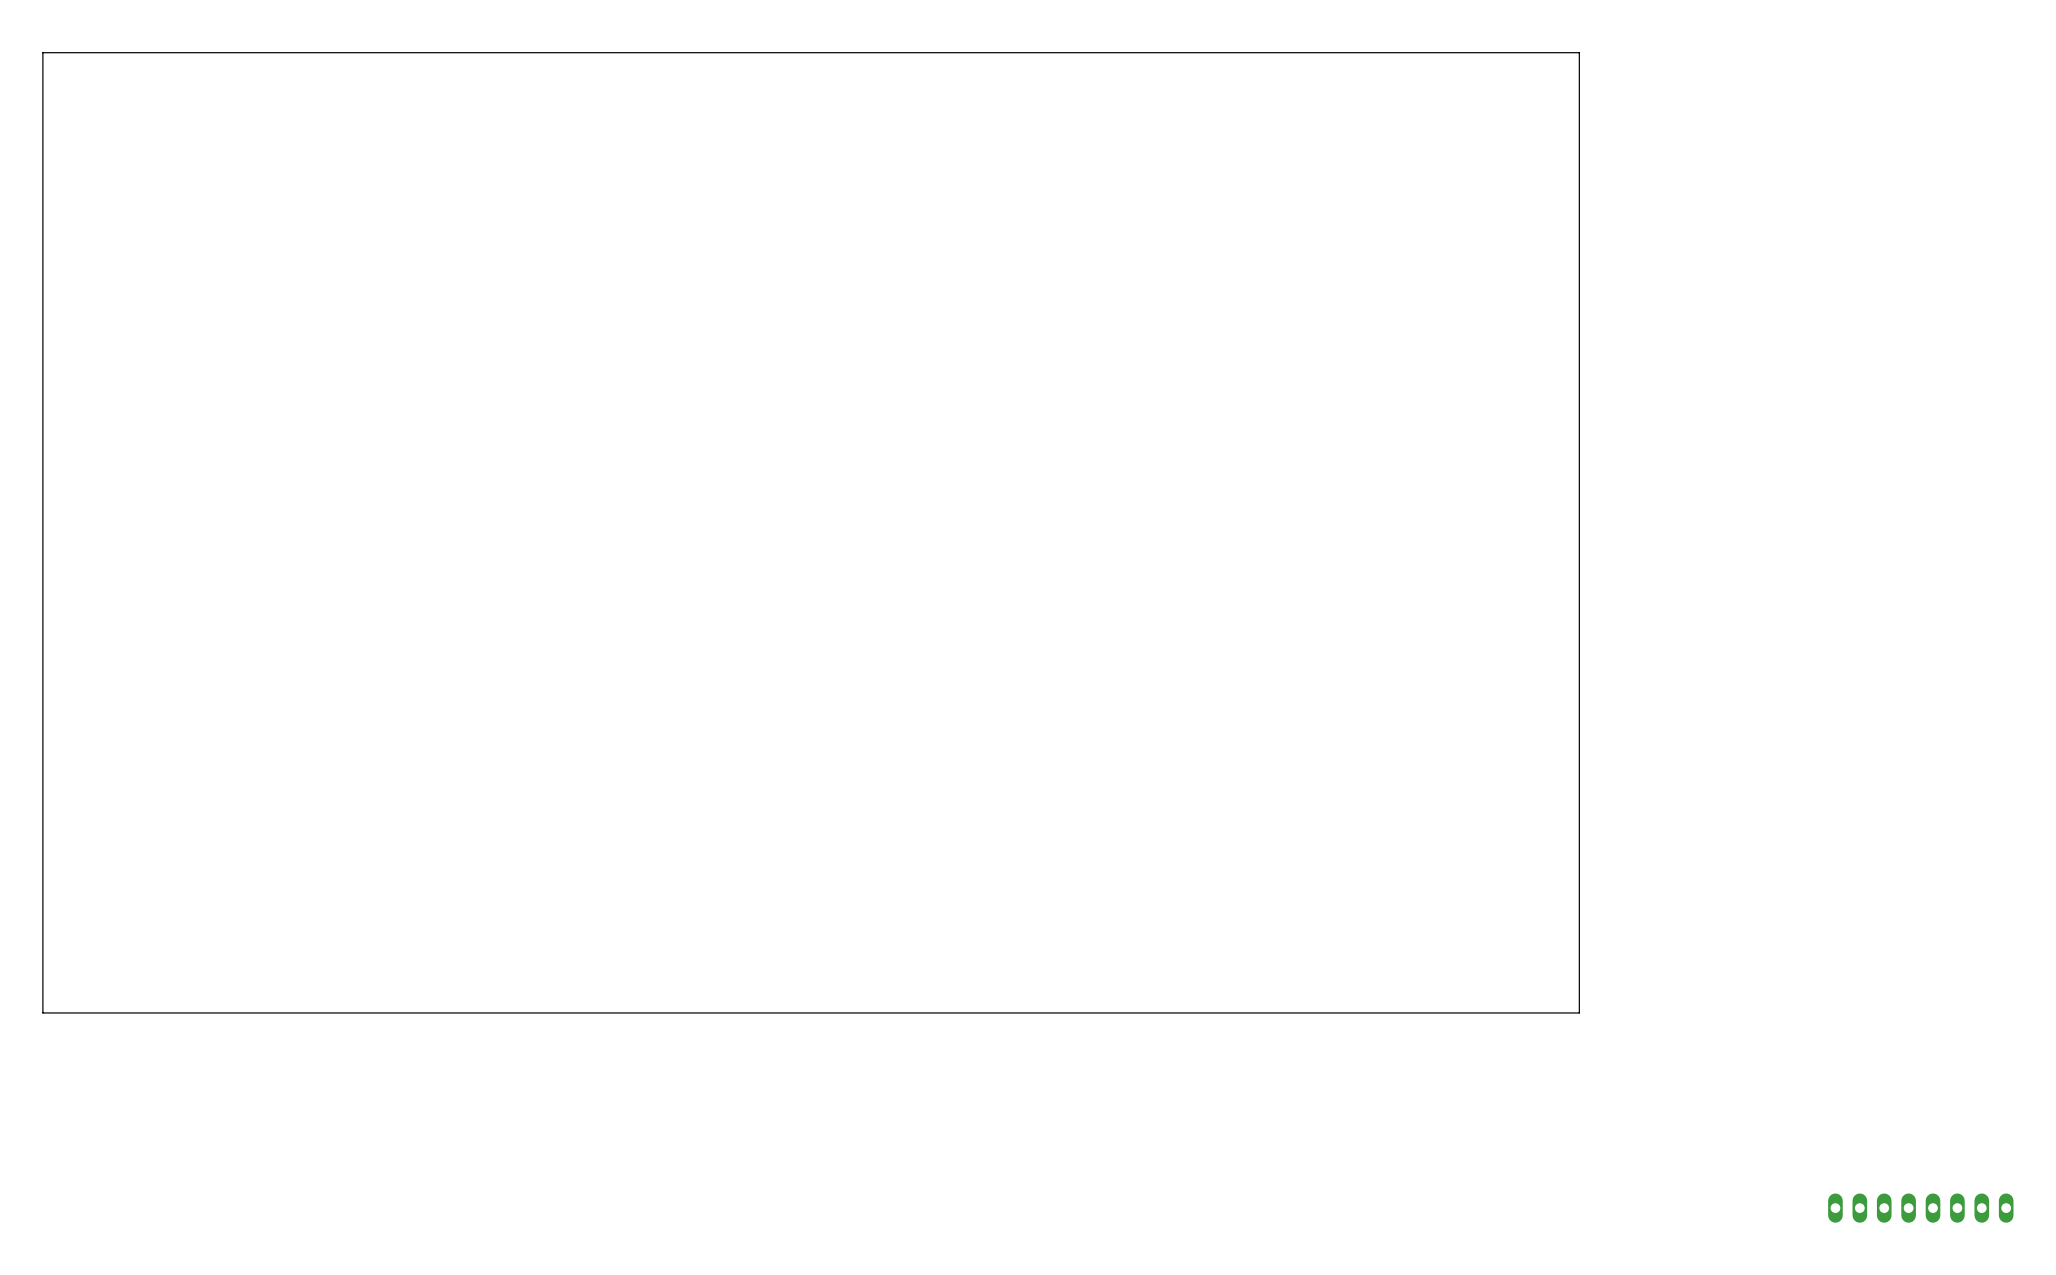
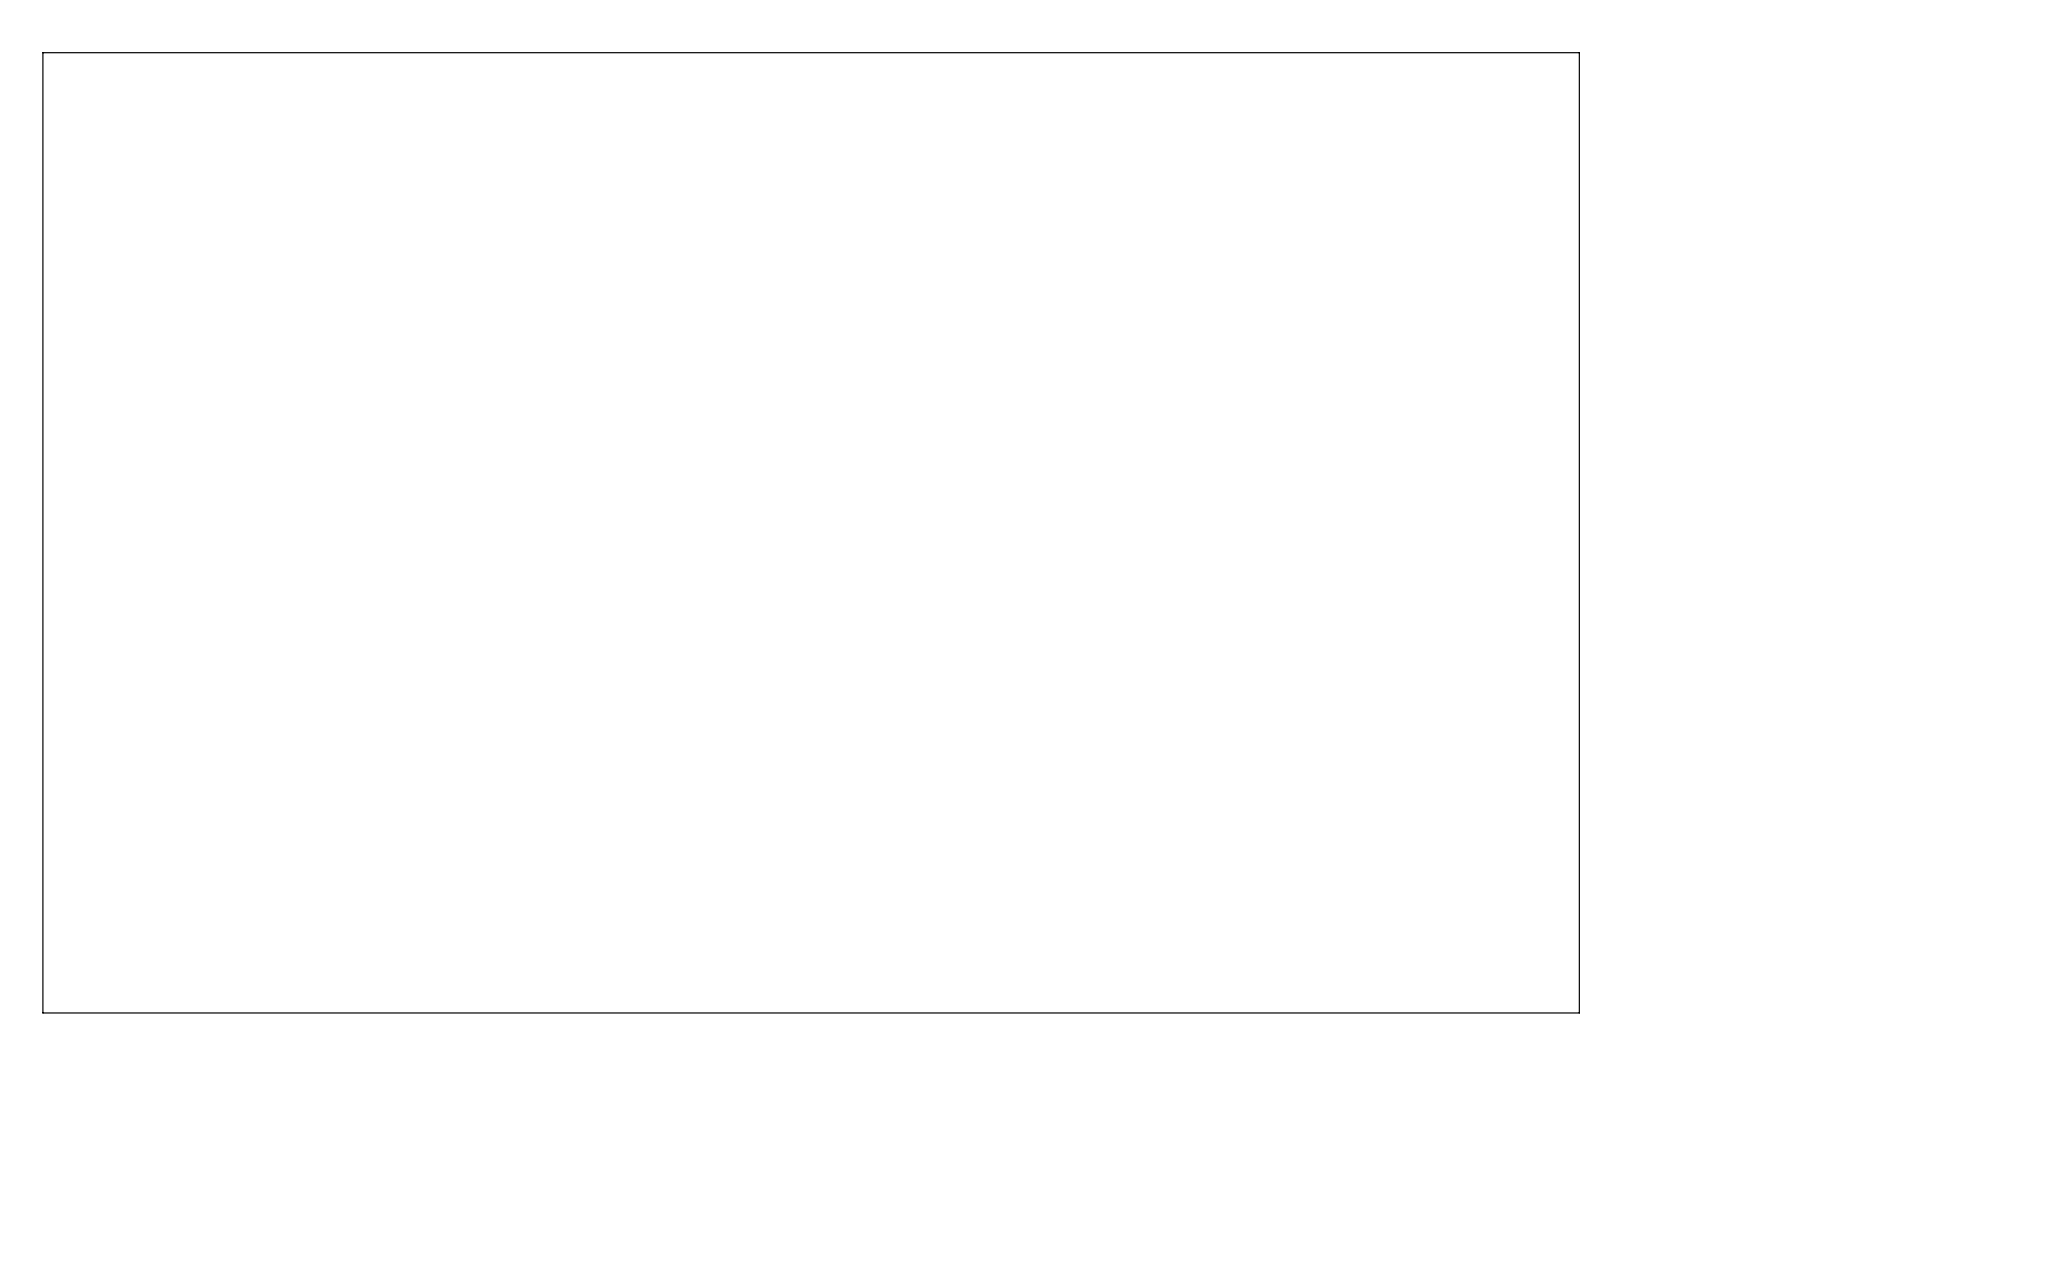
part: (1920, 1208) -> none

